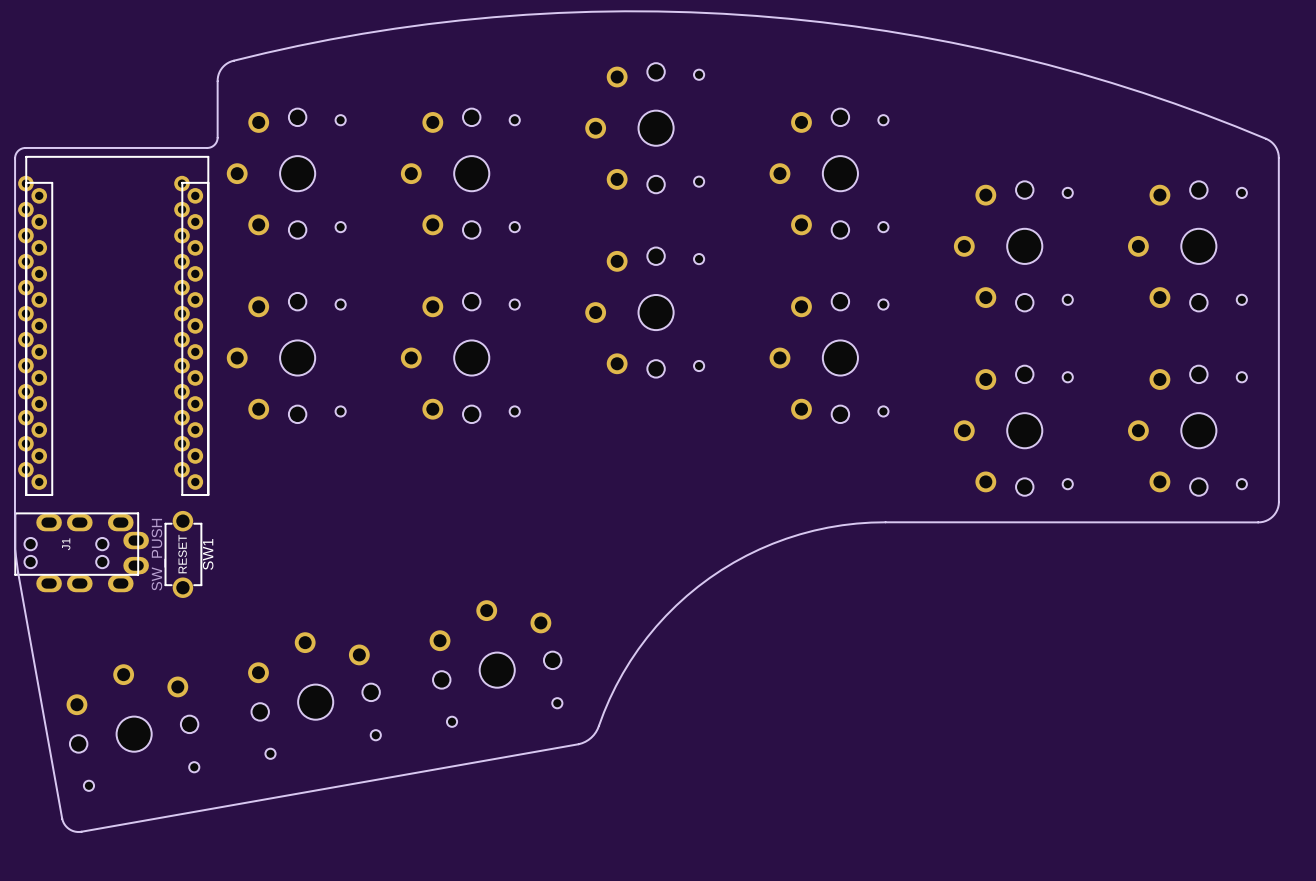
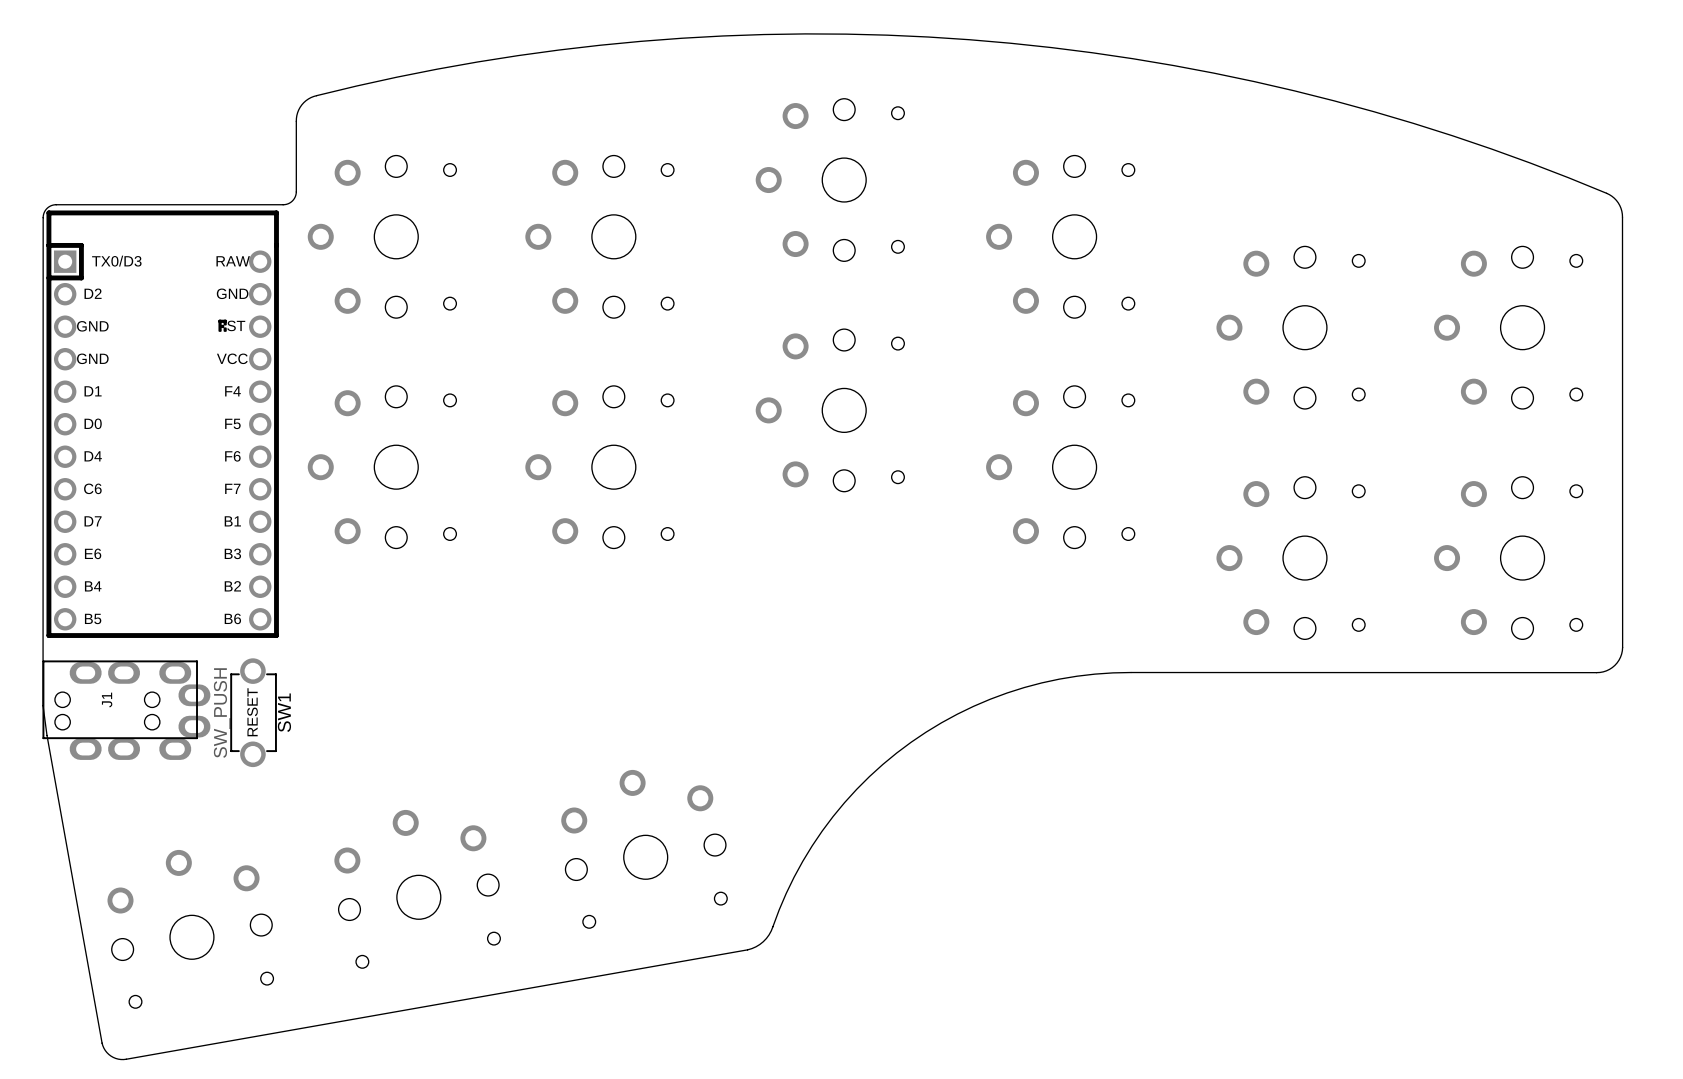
part footprint: [18, 156, 210, 496] -> [46, 210, 279, 638]

